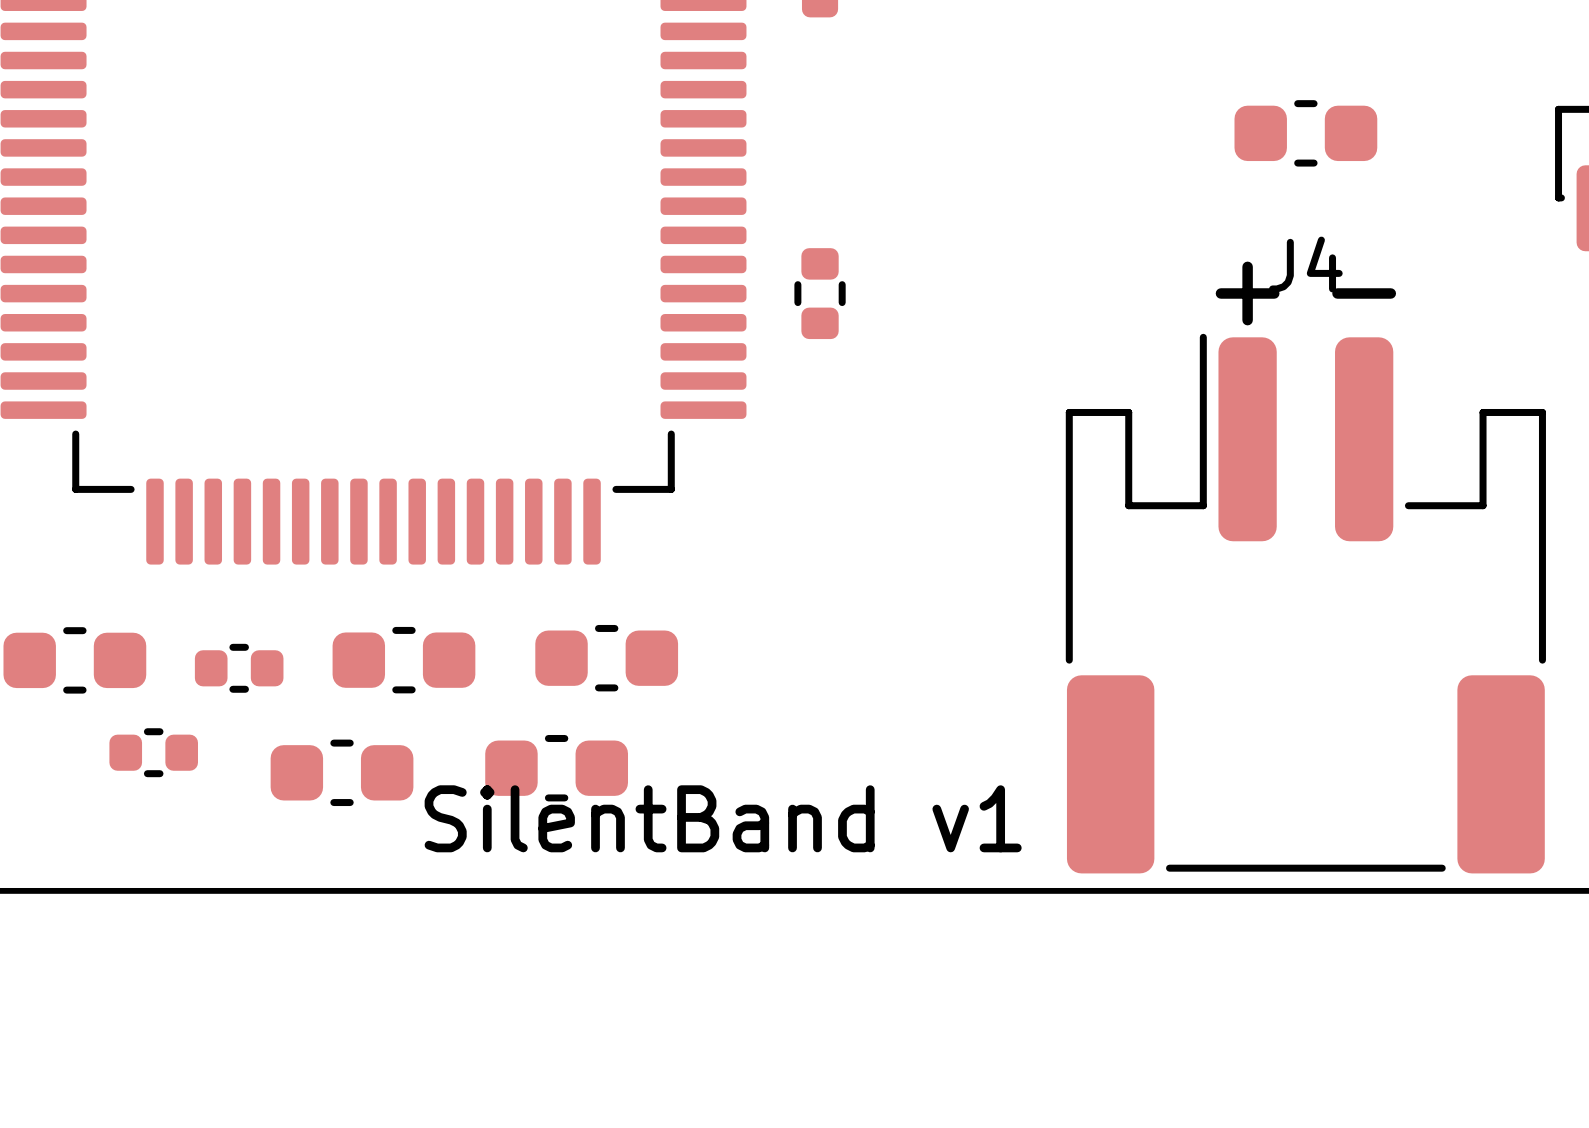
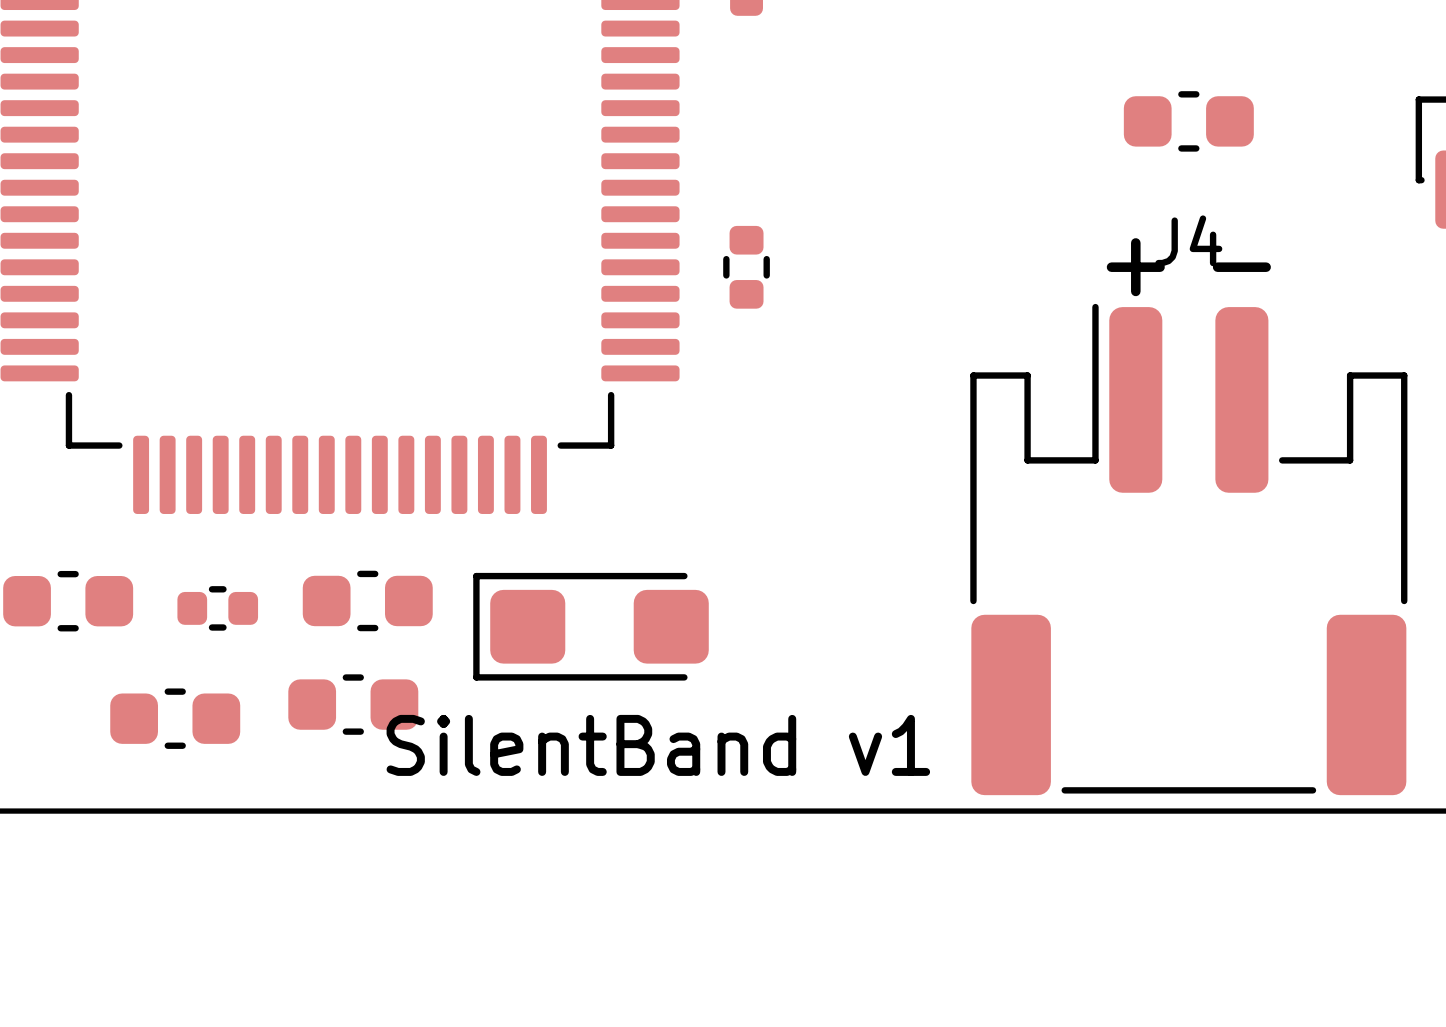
part footprint: [535, 624, 679, 692] -> [473, 572, 709, 681]
part footprint: [109, 728, 198, 778] -> [110, 688, 241, 749]
part: (556, 768) -> none
part position: (342, 772) -> (353, 704)

